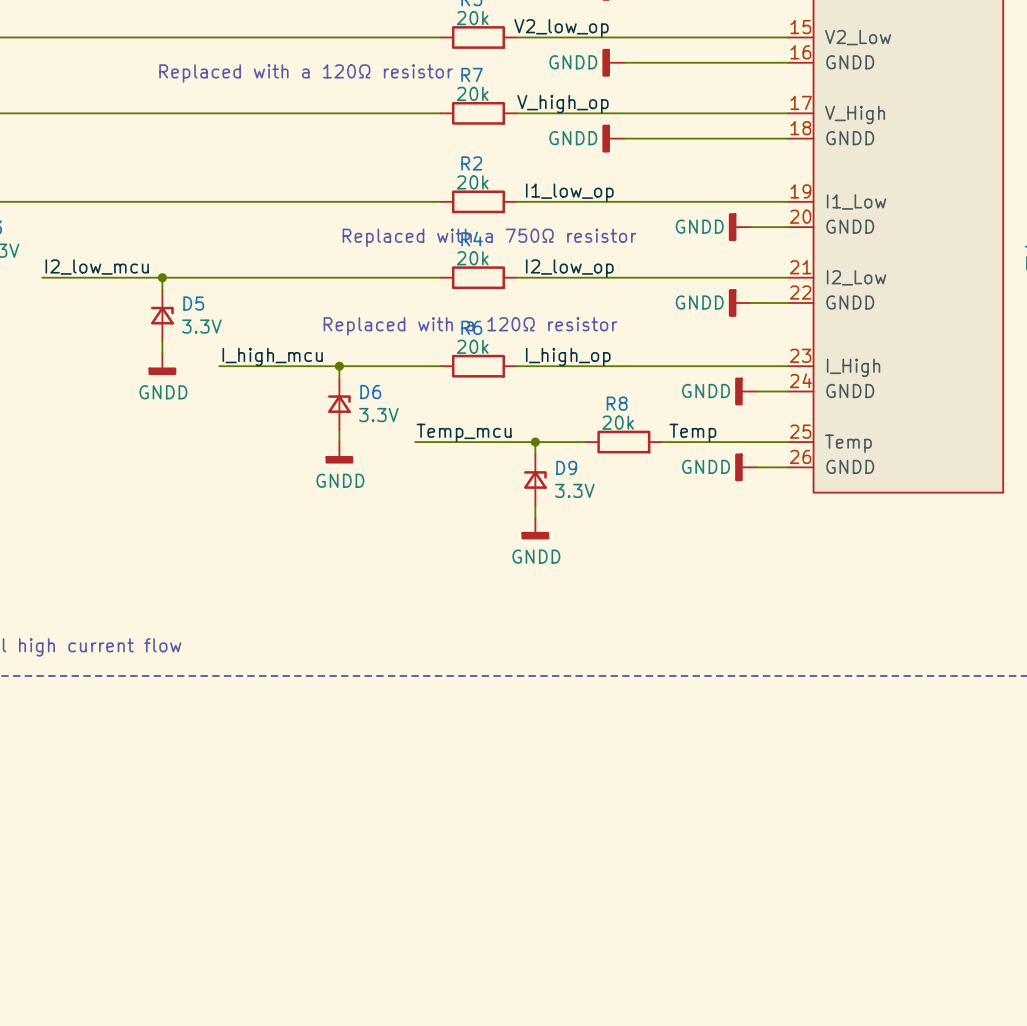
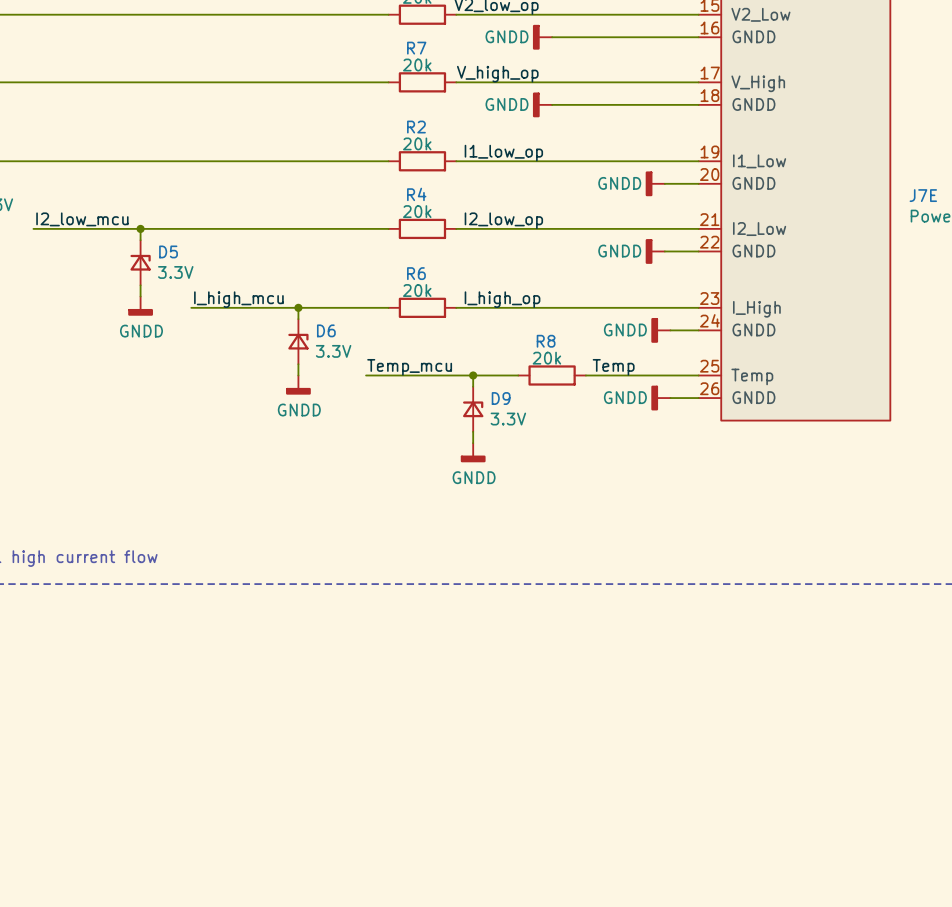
text: Replaced with a 120Ω resistor (306, 73) -> none
text: Replaced with a 750Ω resistor (489, 237) -> none
text: Replaced with a 120Ω resistor (470, 326) -> none

